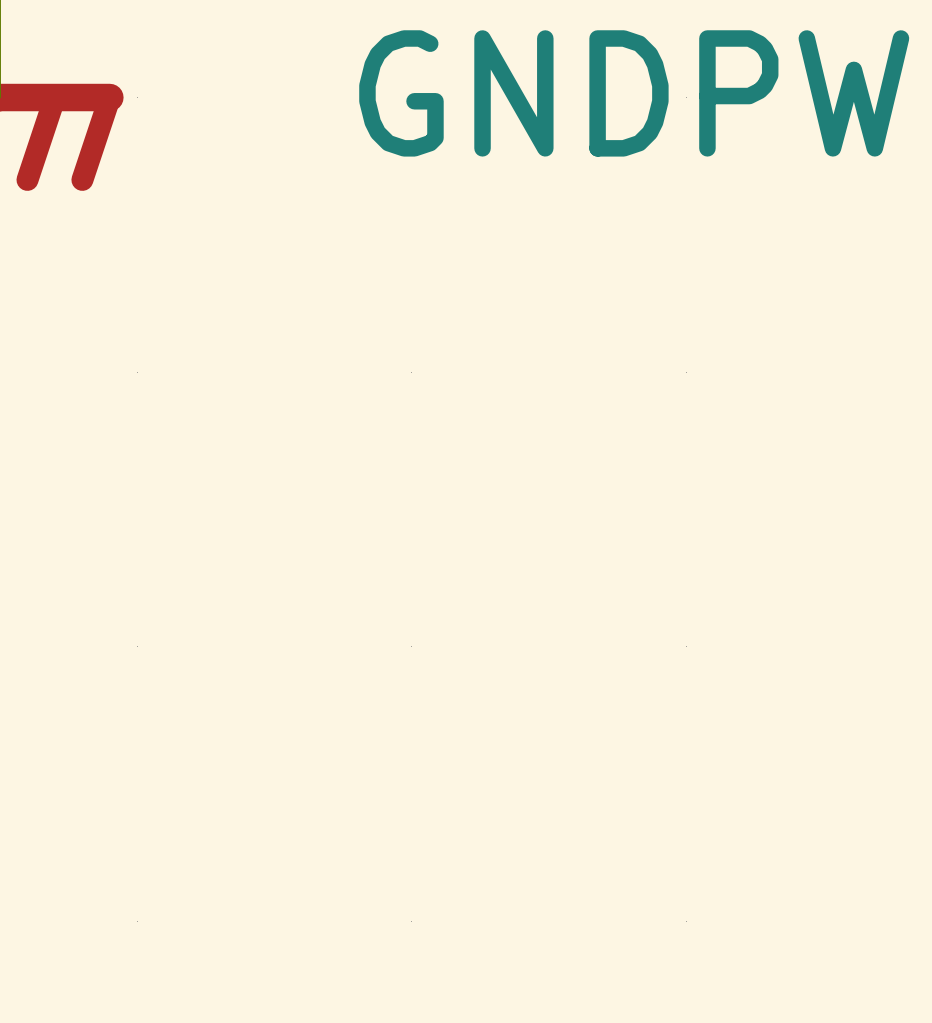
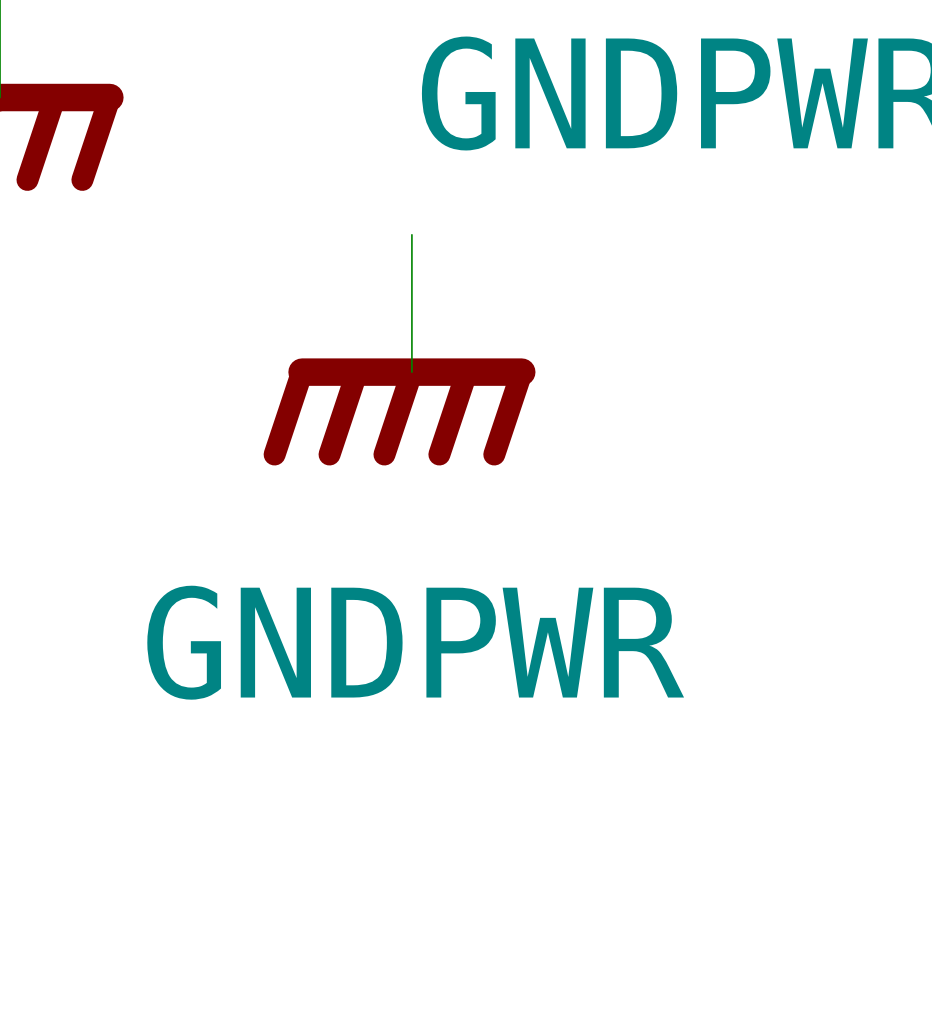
wire: none -> (411, 234) (411, 372)
power symbol: none -> GNDPWR (399, 411)

